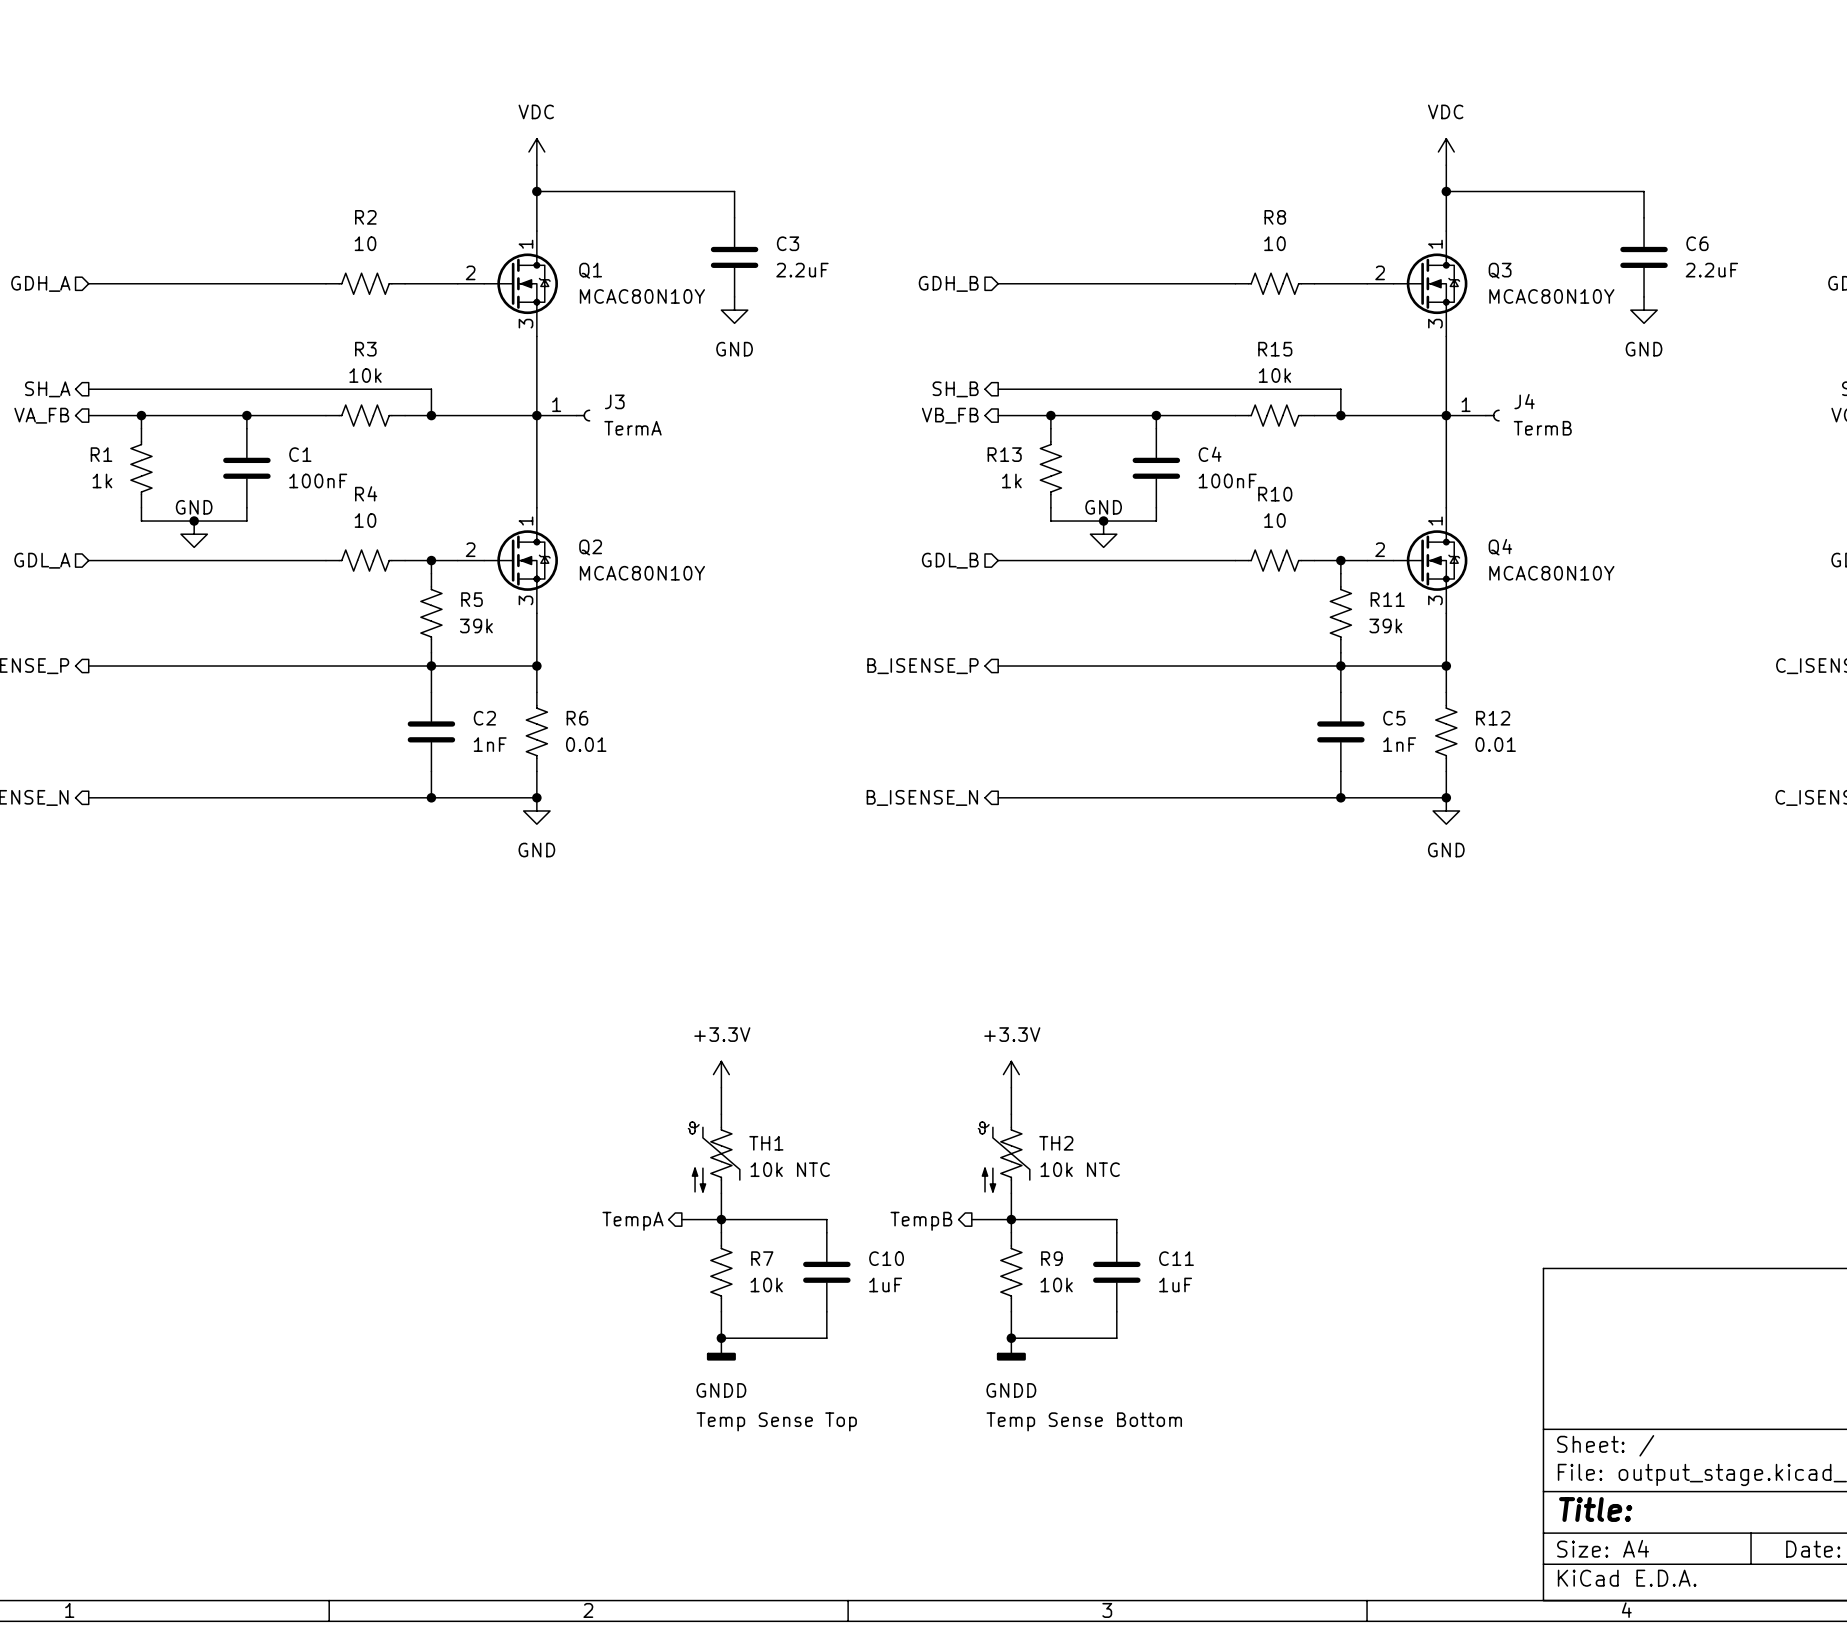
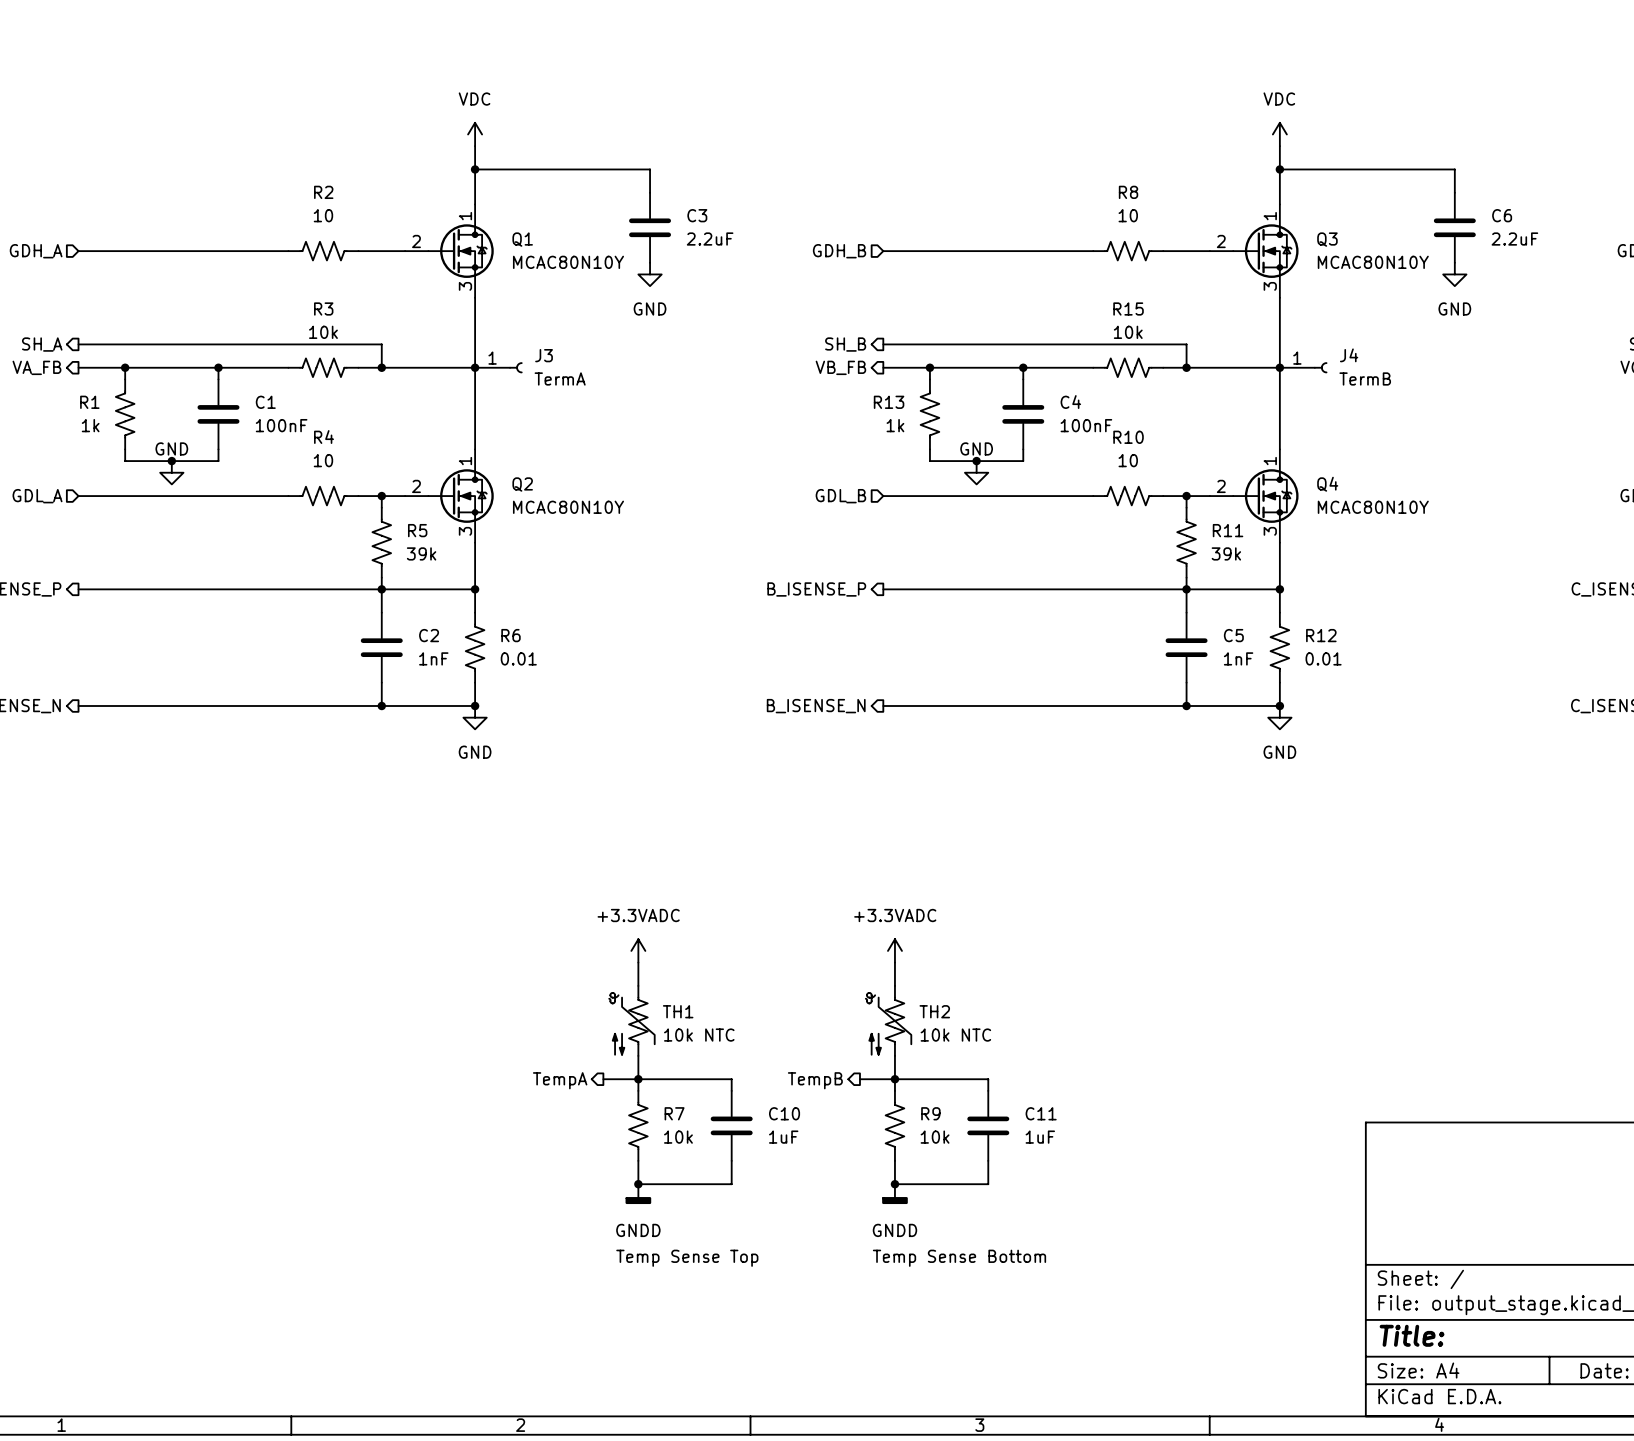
power symbol: +3.3V (721, 1074) -> +3.3VADC (638, 950)
power symbol: +3.3V (1011, 1074) -> +3.3VADC (894, 950)

